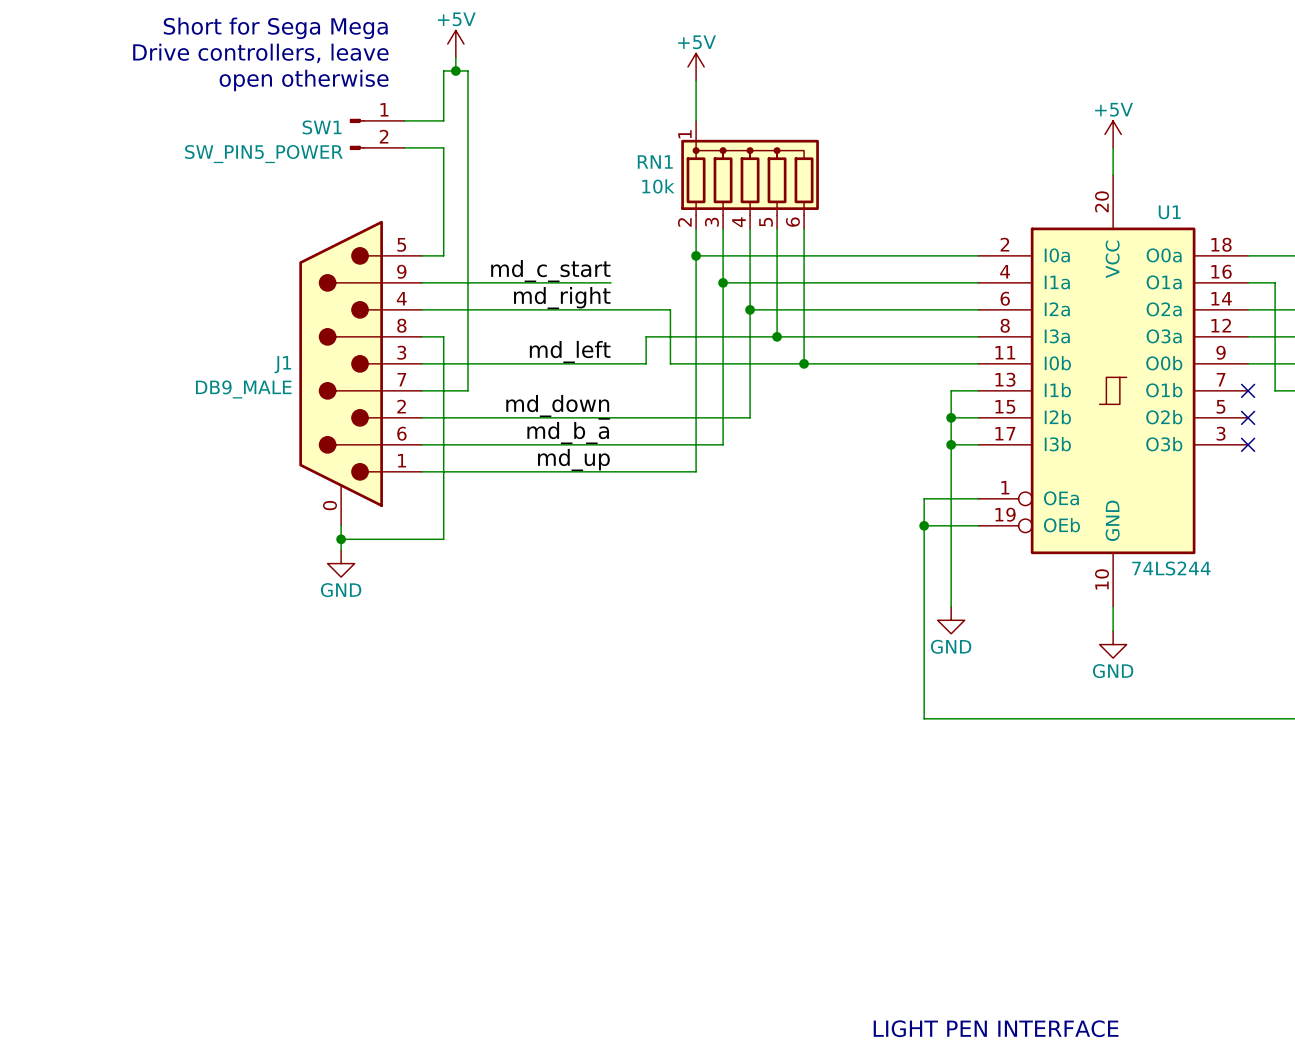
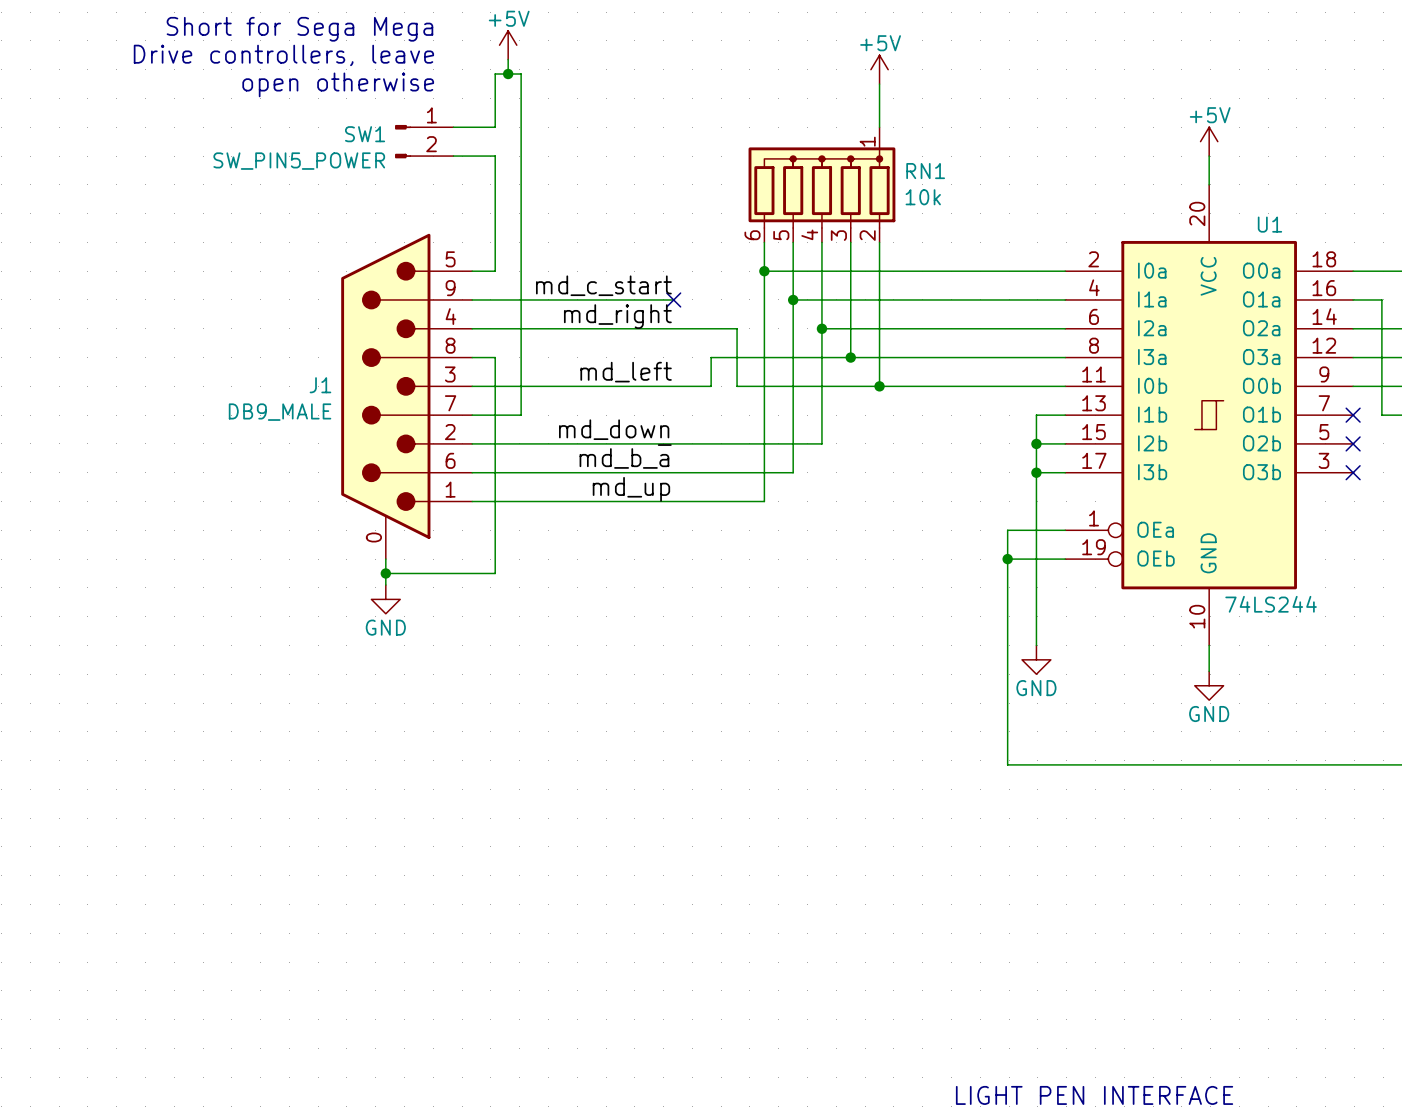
power symbol position: +5V (696, 66) -> +5V (879, 69)
wire: (696, 80) (696, 120) -> (879, 84) (879, 127)
RN1 flip: as is (750, 177) -> left-right (821, 187)
no-connect mark: none -> (673, 299)

